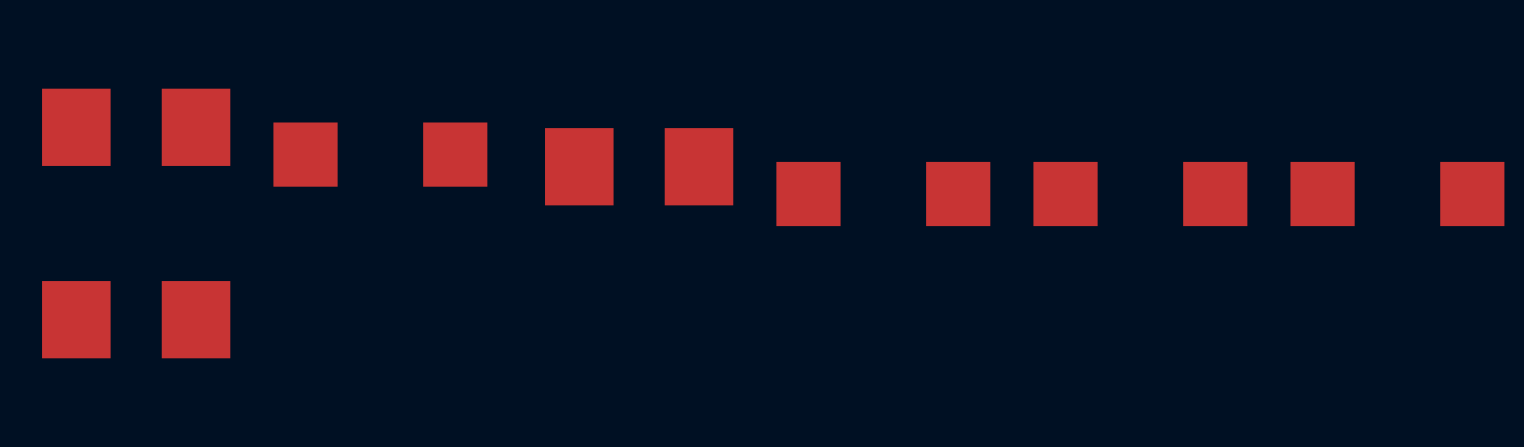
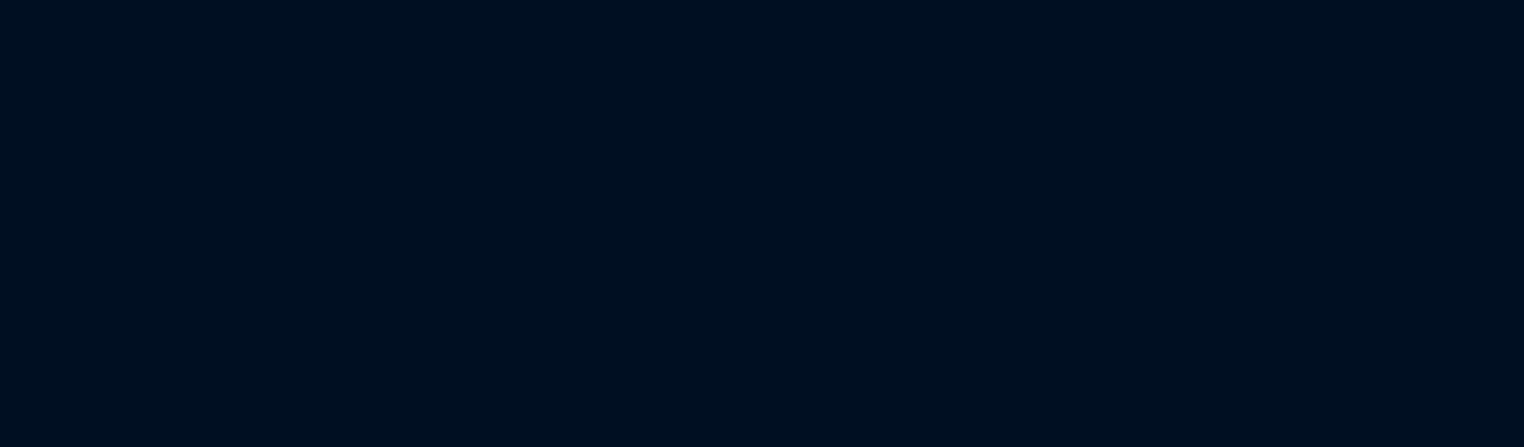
part: (136, 127) -> none
part: (380, 154) -> none
part: (639, 166) -> none
part: (883, 194) -> none
part: (1140, 194) -> none
part: (1397, 194) -> none
part: (136, 319) -> none

